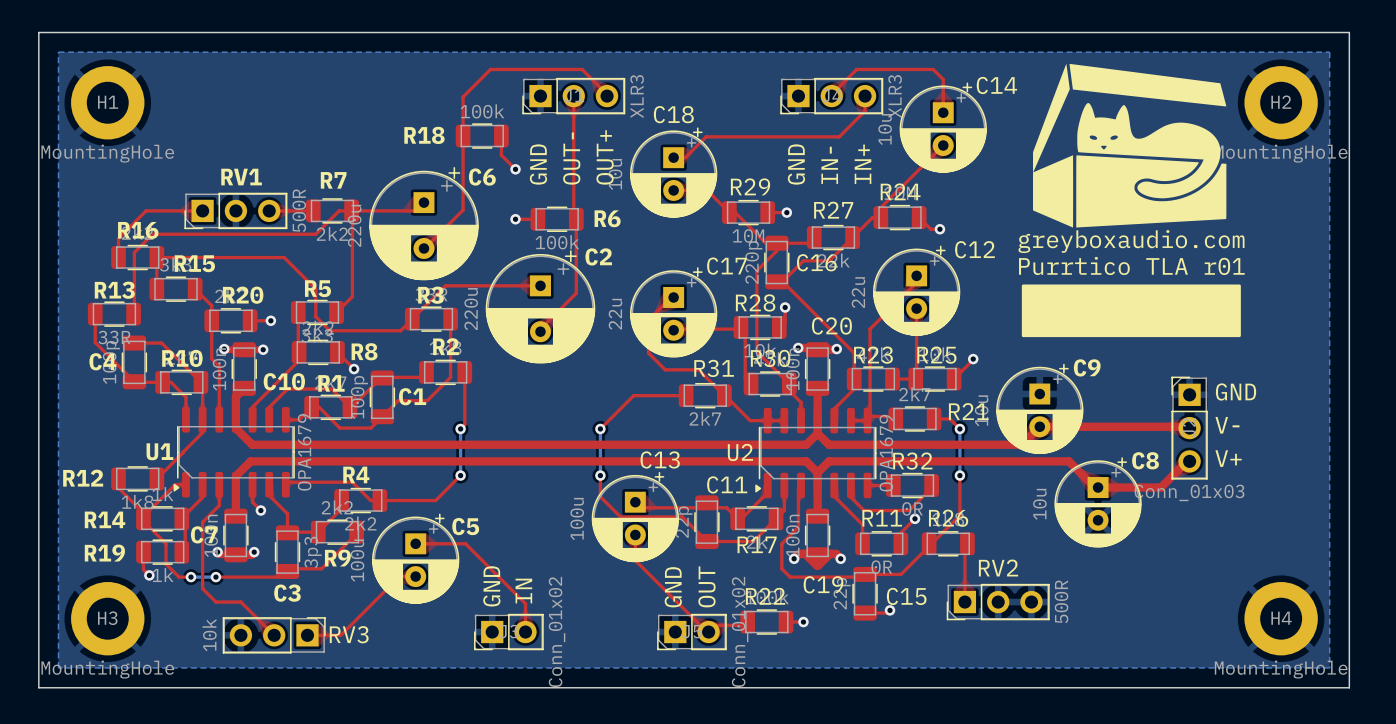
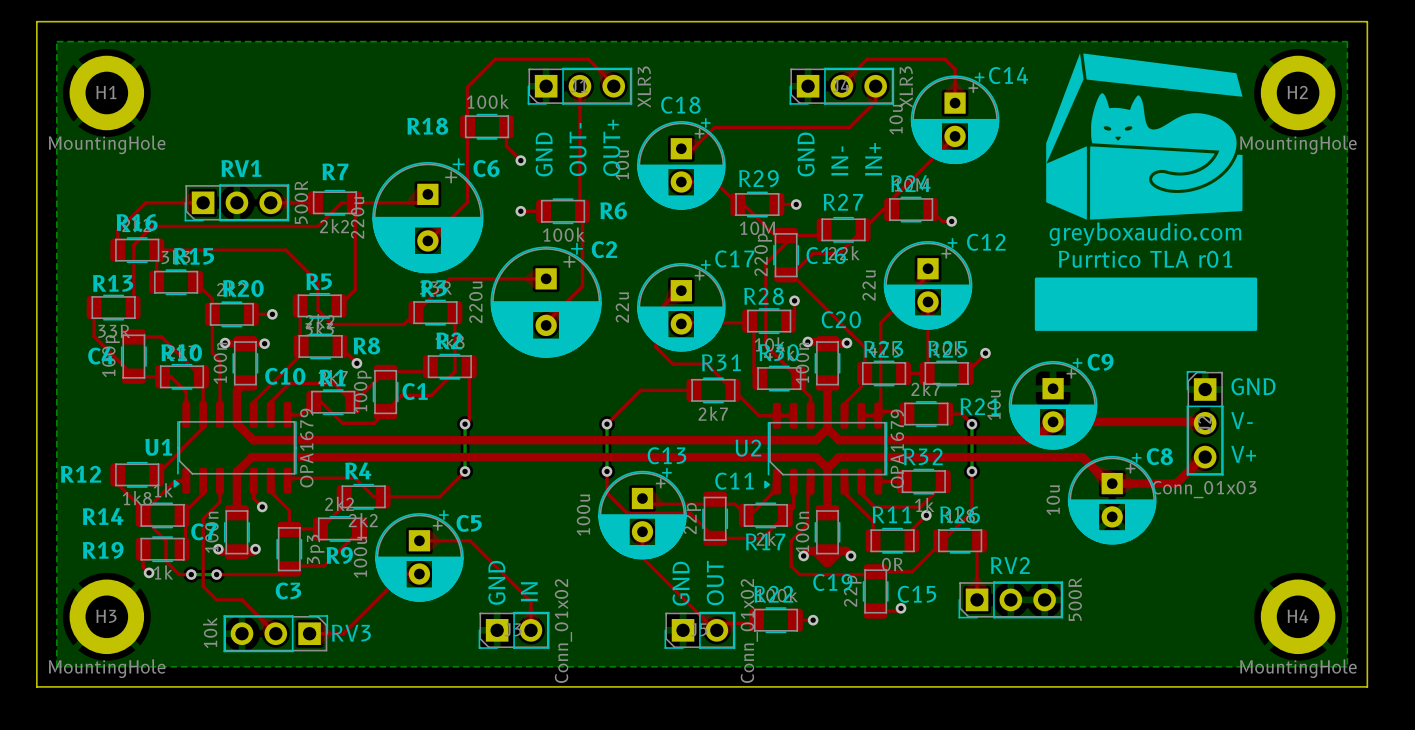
R32 value: 0R (912, 508) -> 1k (924, 504)

